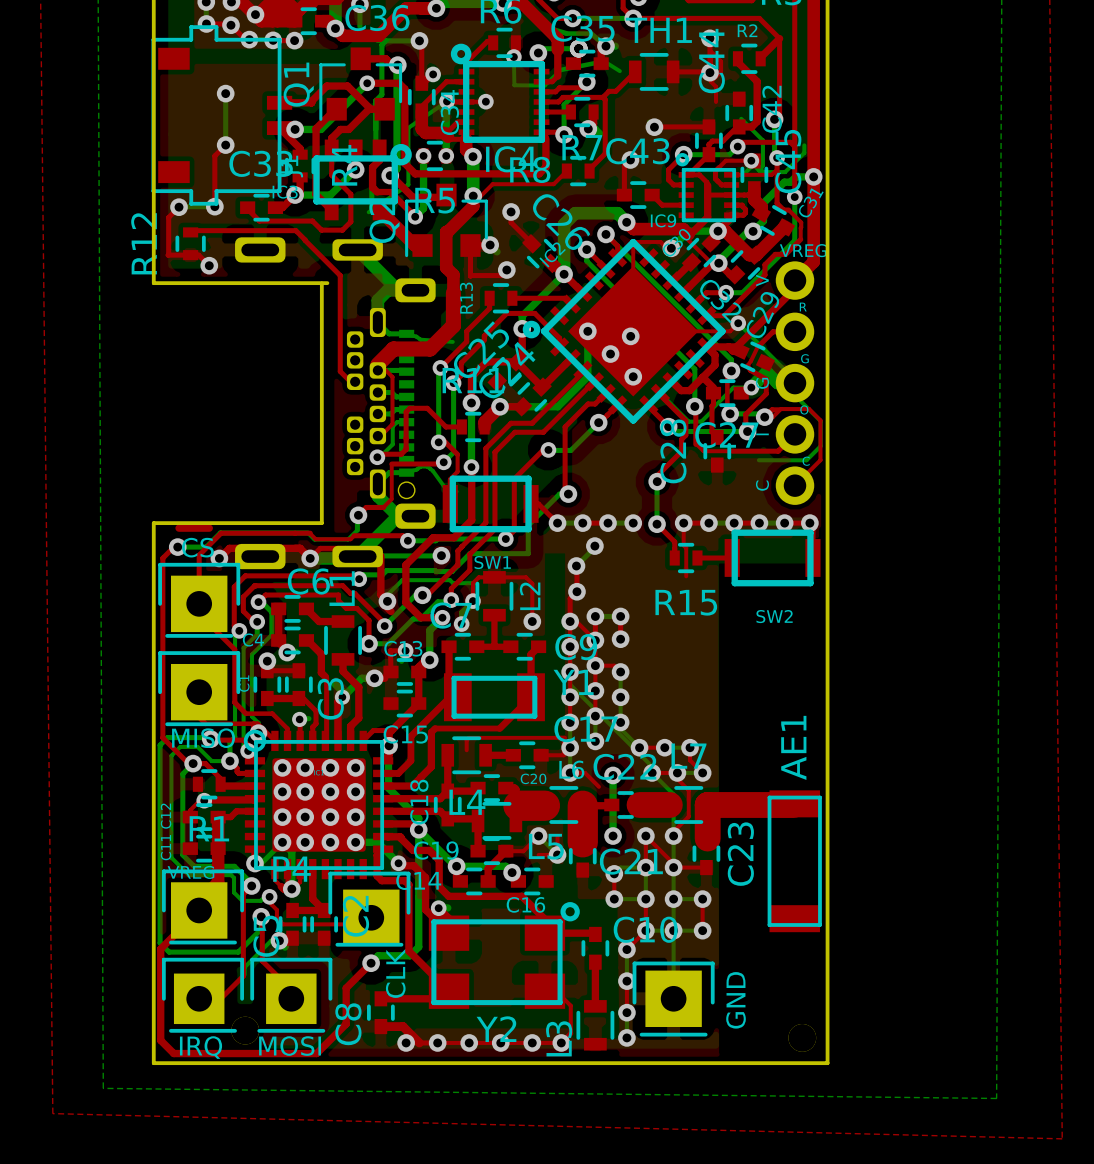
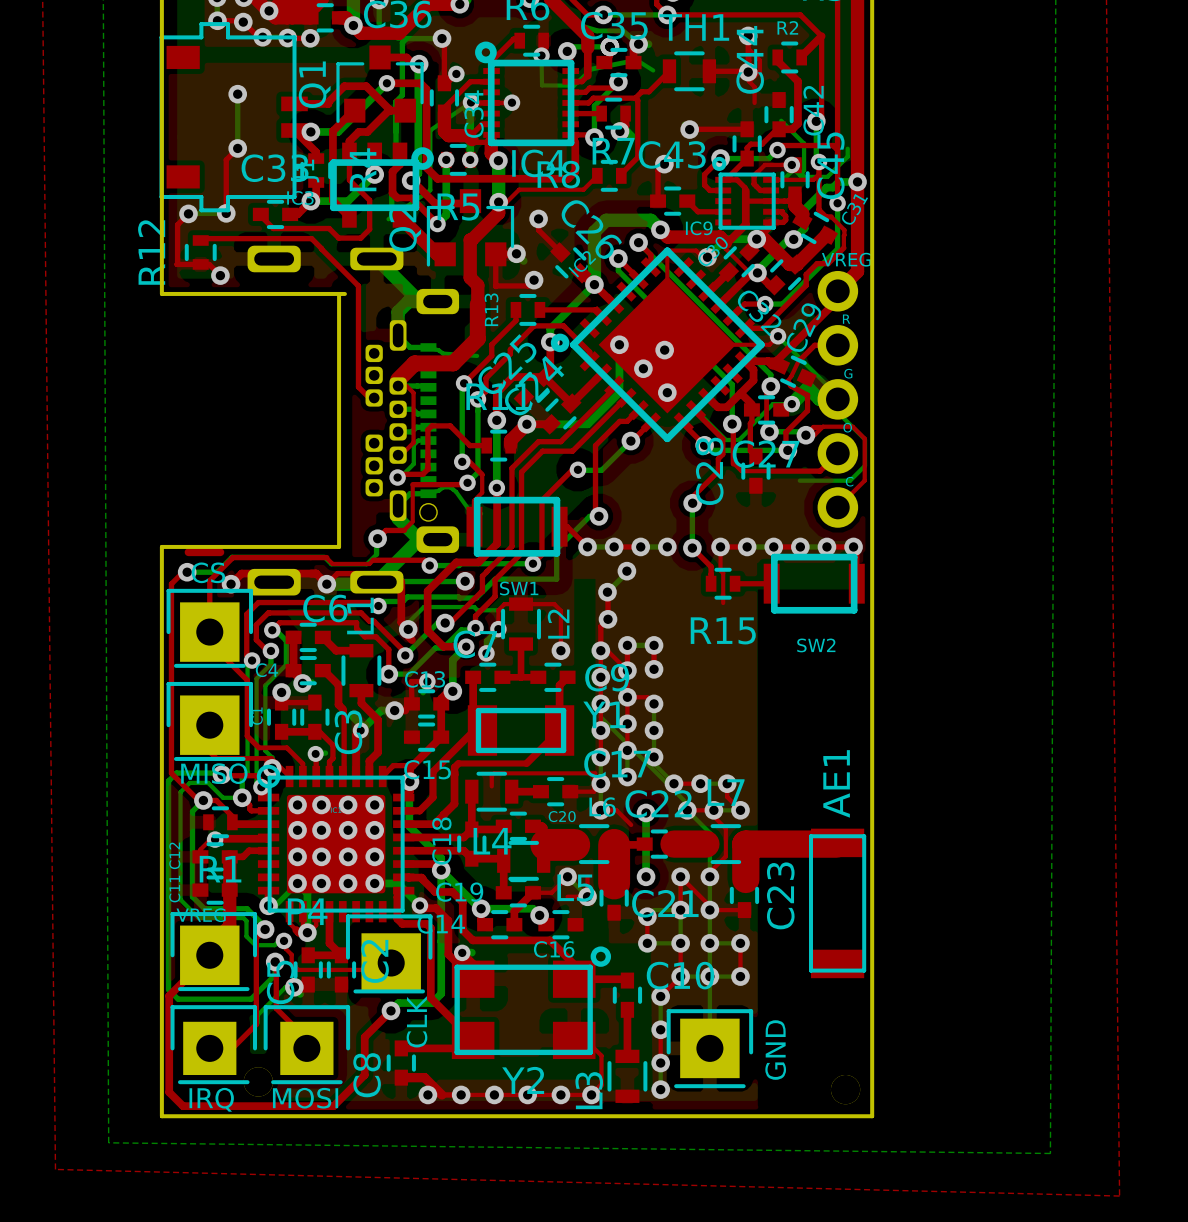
part text: V (762, 280) -> none
part text: G (762, 383) -> none
part text: I (762, 434) -> none
part text: C (762, 485) -> none

